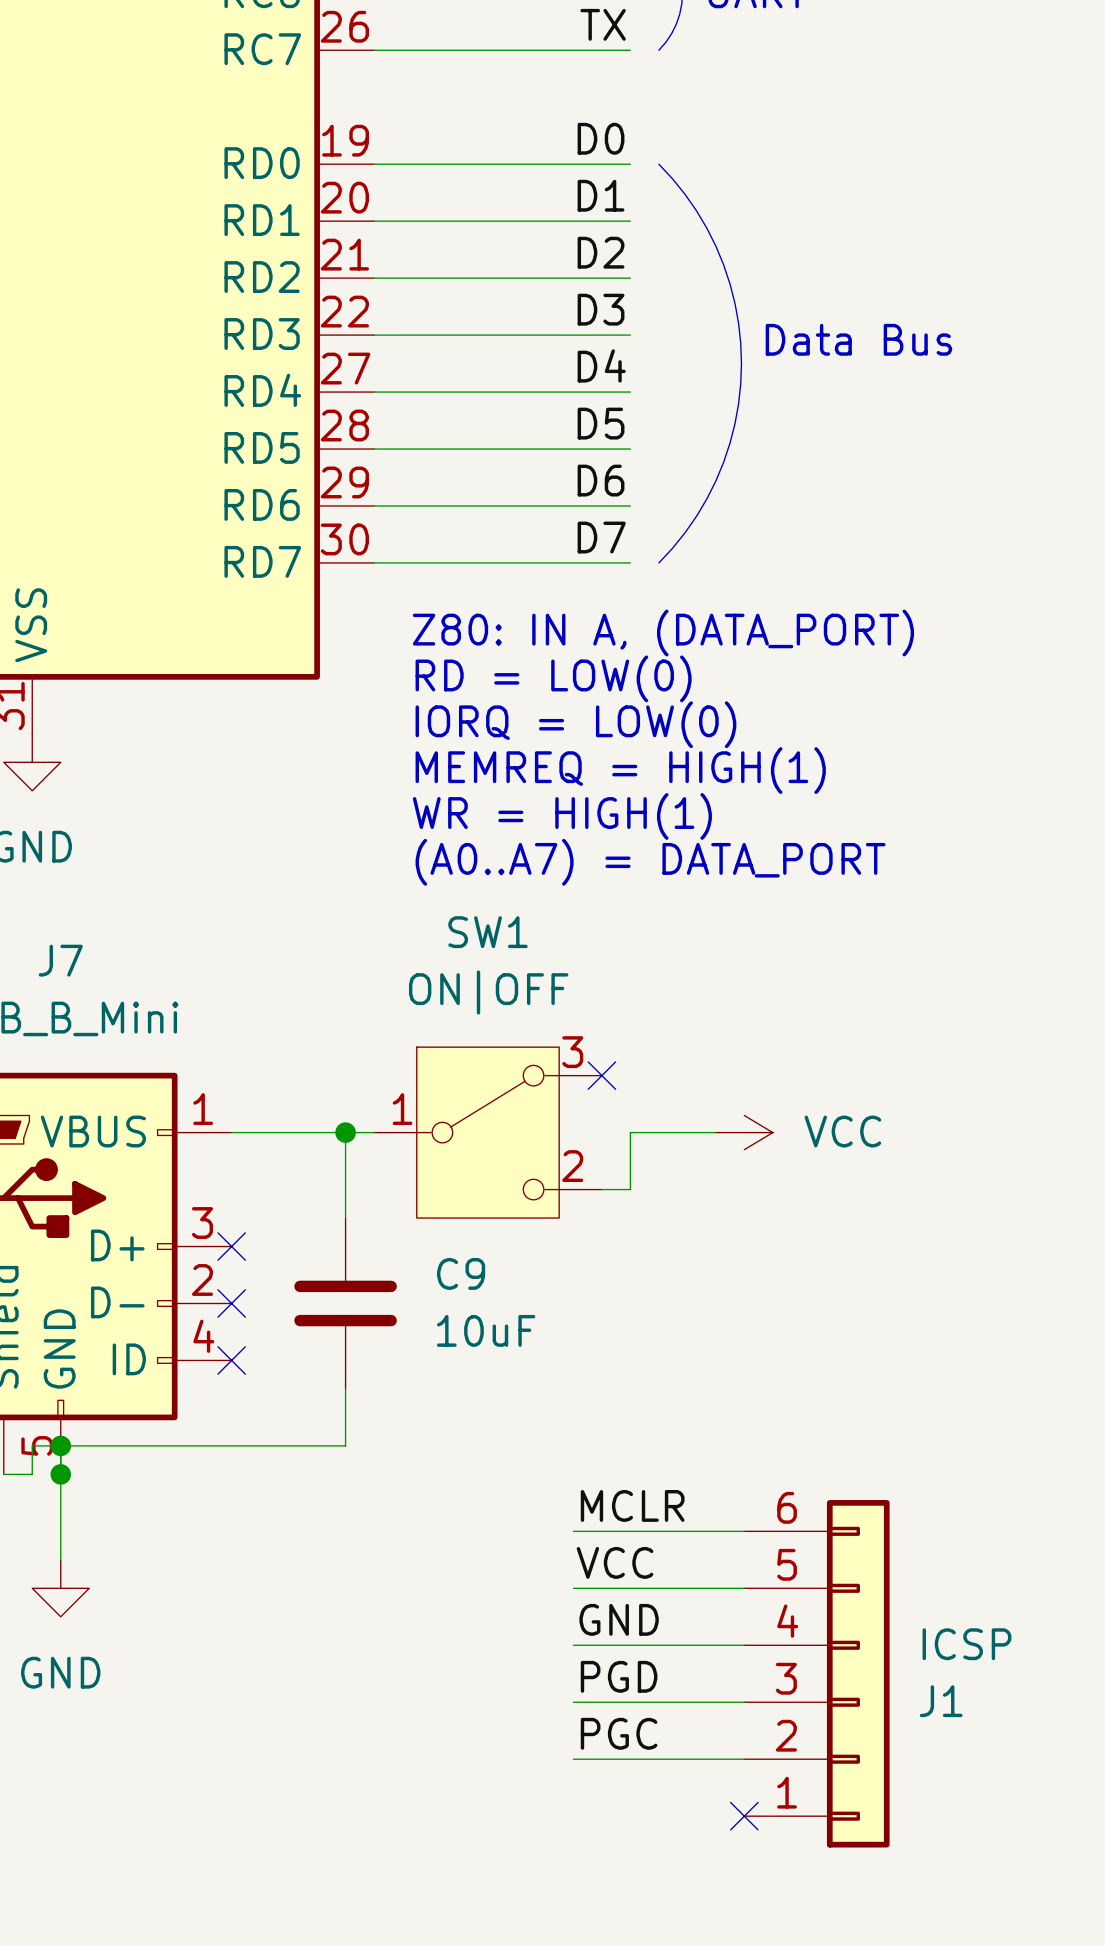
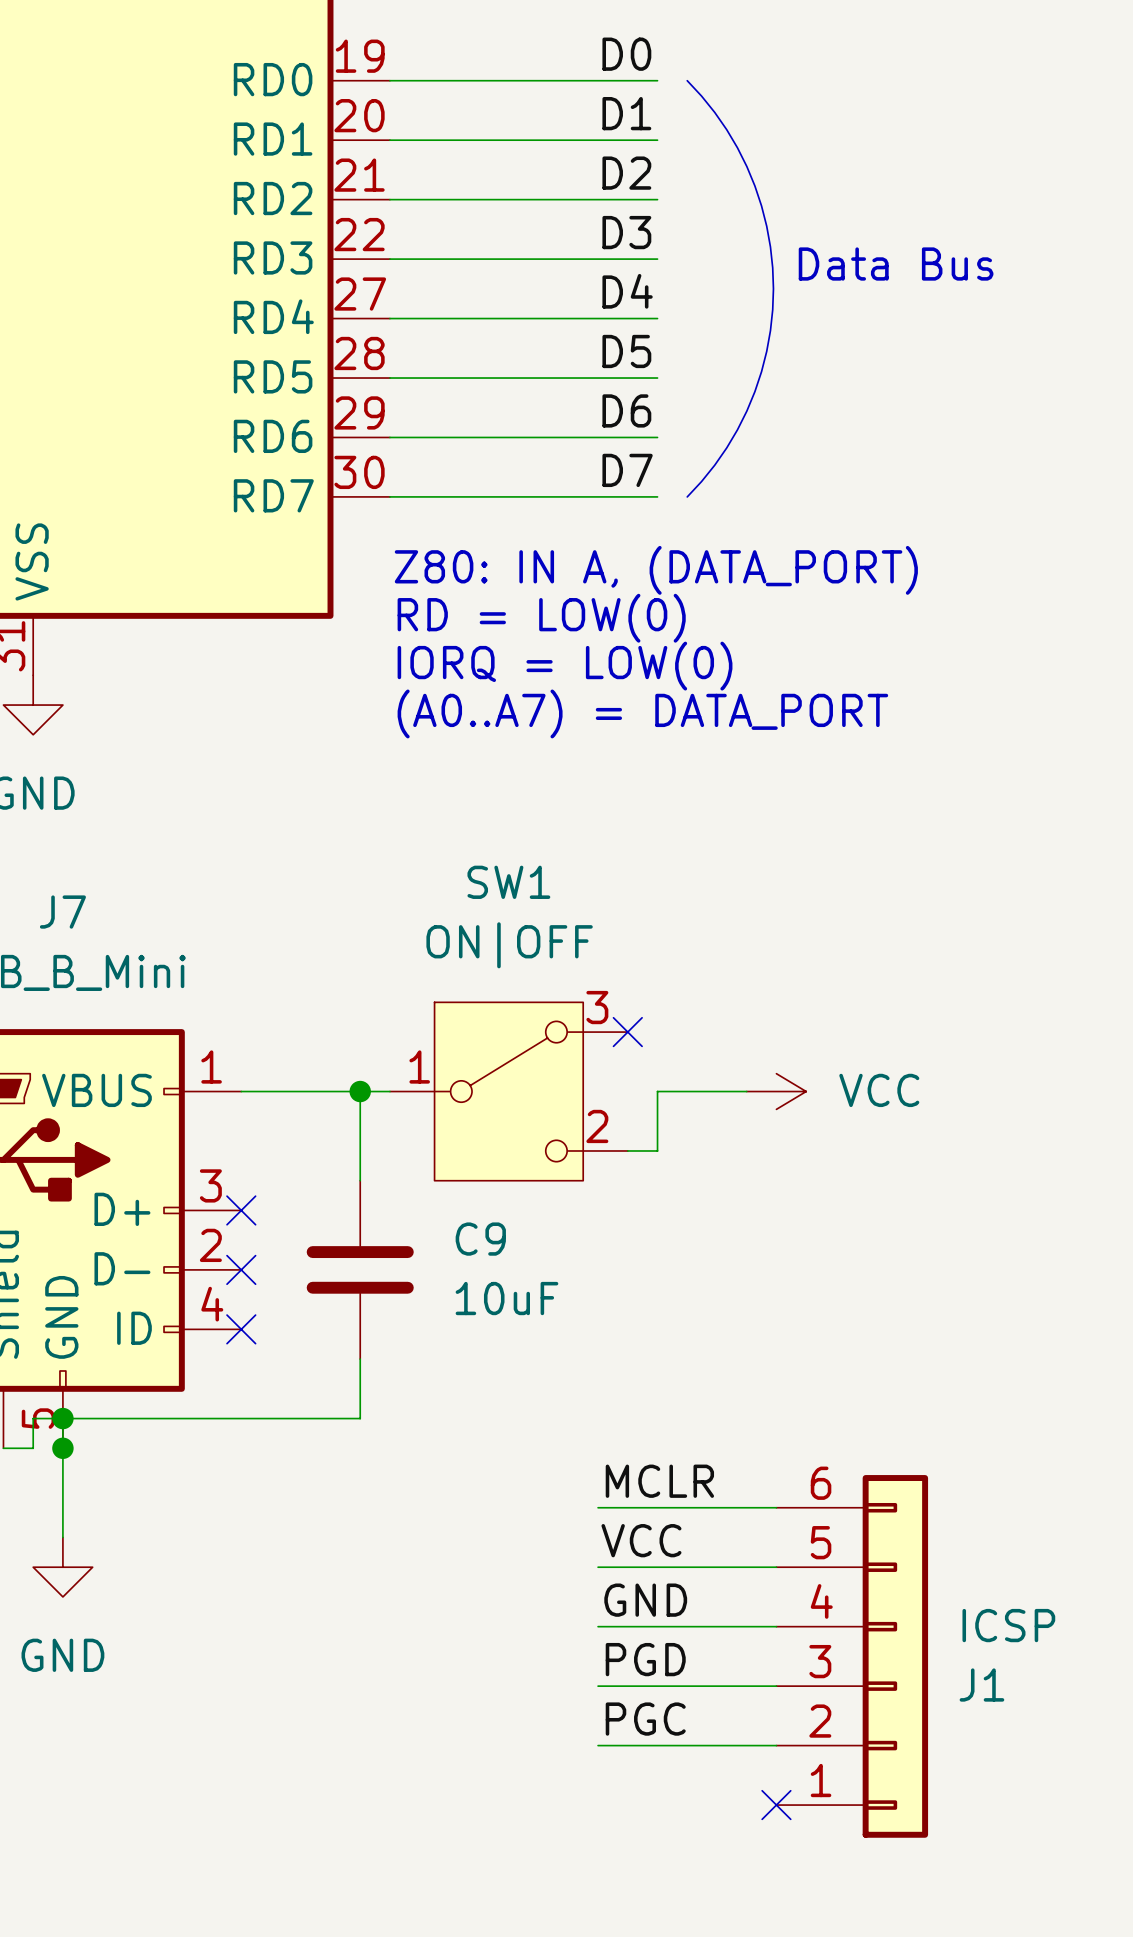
text position: Z80: IN A, (DATA_PORT) (663, 633) -> Z80: IN A, (DATA_PORT) (656, 570)
text position: RD = LOW(0) (553, 678) -> RD = LOW(0) (541, 618)
text position: IORQ = LOW(0) (575, 724) -> IORQ = LOW(0) (565, 666)
text: MEMREQ = HIGH(1) (620, 770) -> none
text: WR = HIGH(1) (562, 816) -> none
text position: (A0..A7) = DATA_PORT (650, 862) -> (A0..A7) = DATA_PORT (642, 713)

